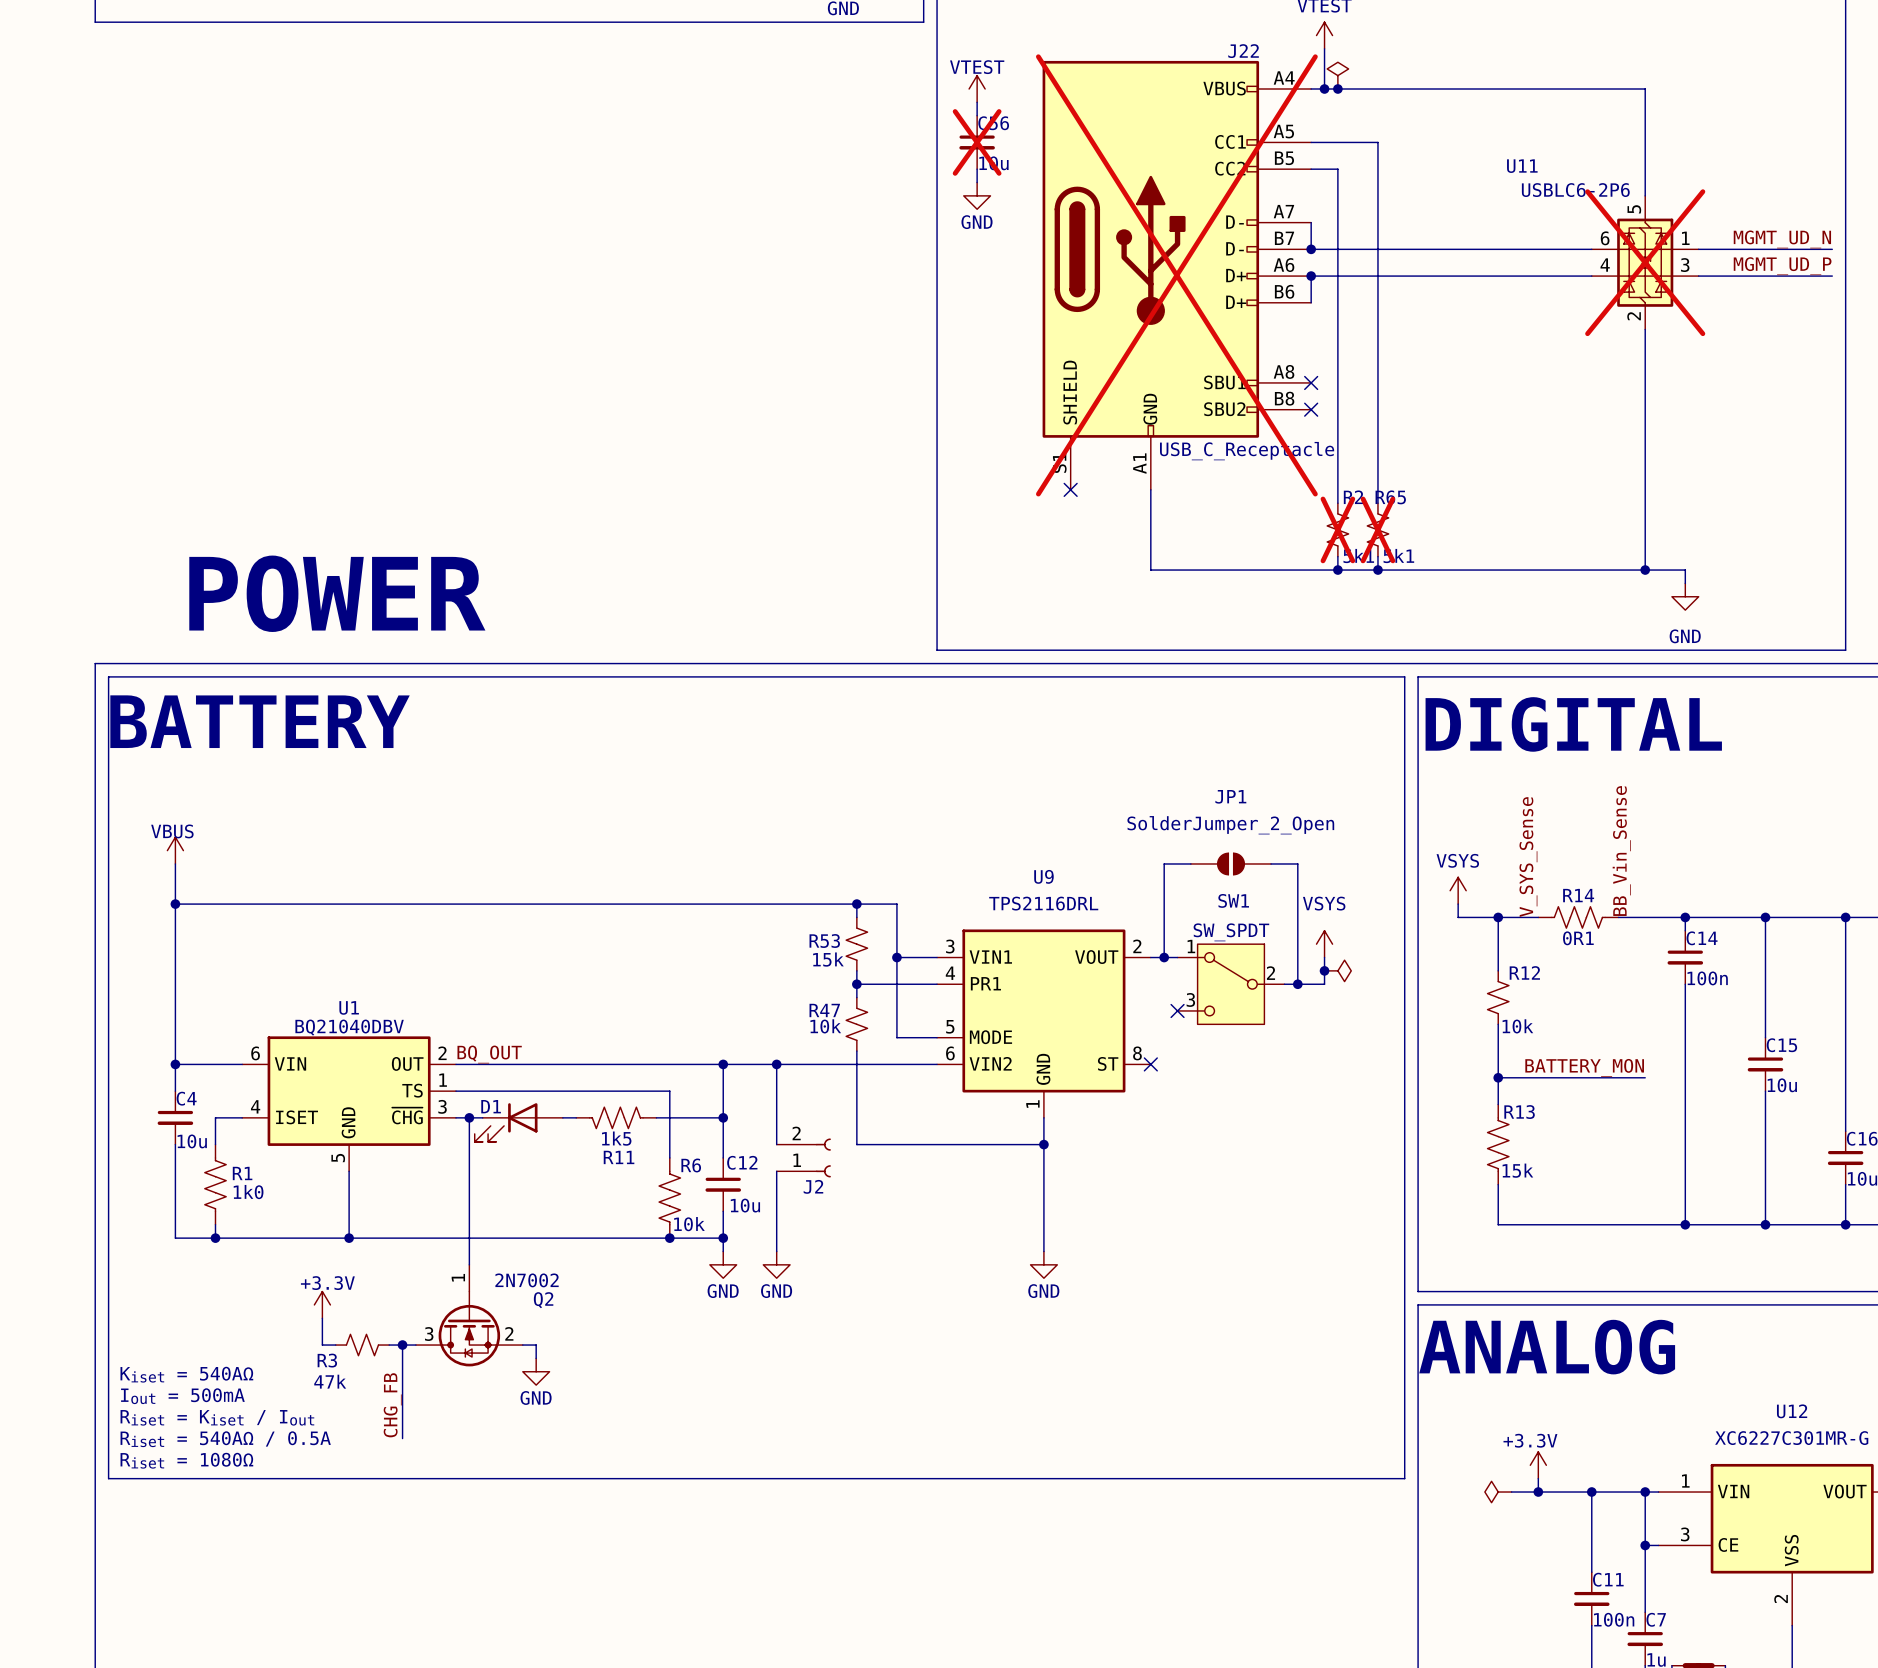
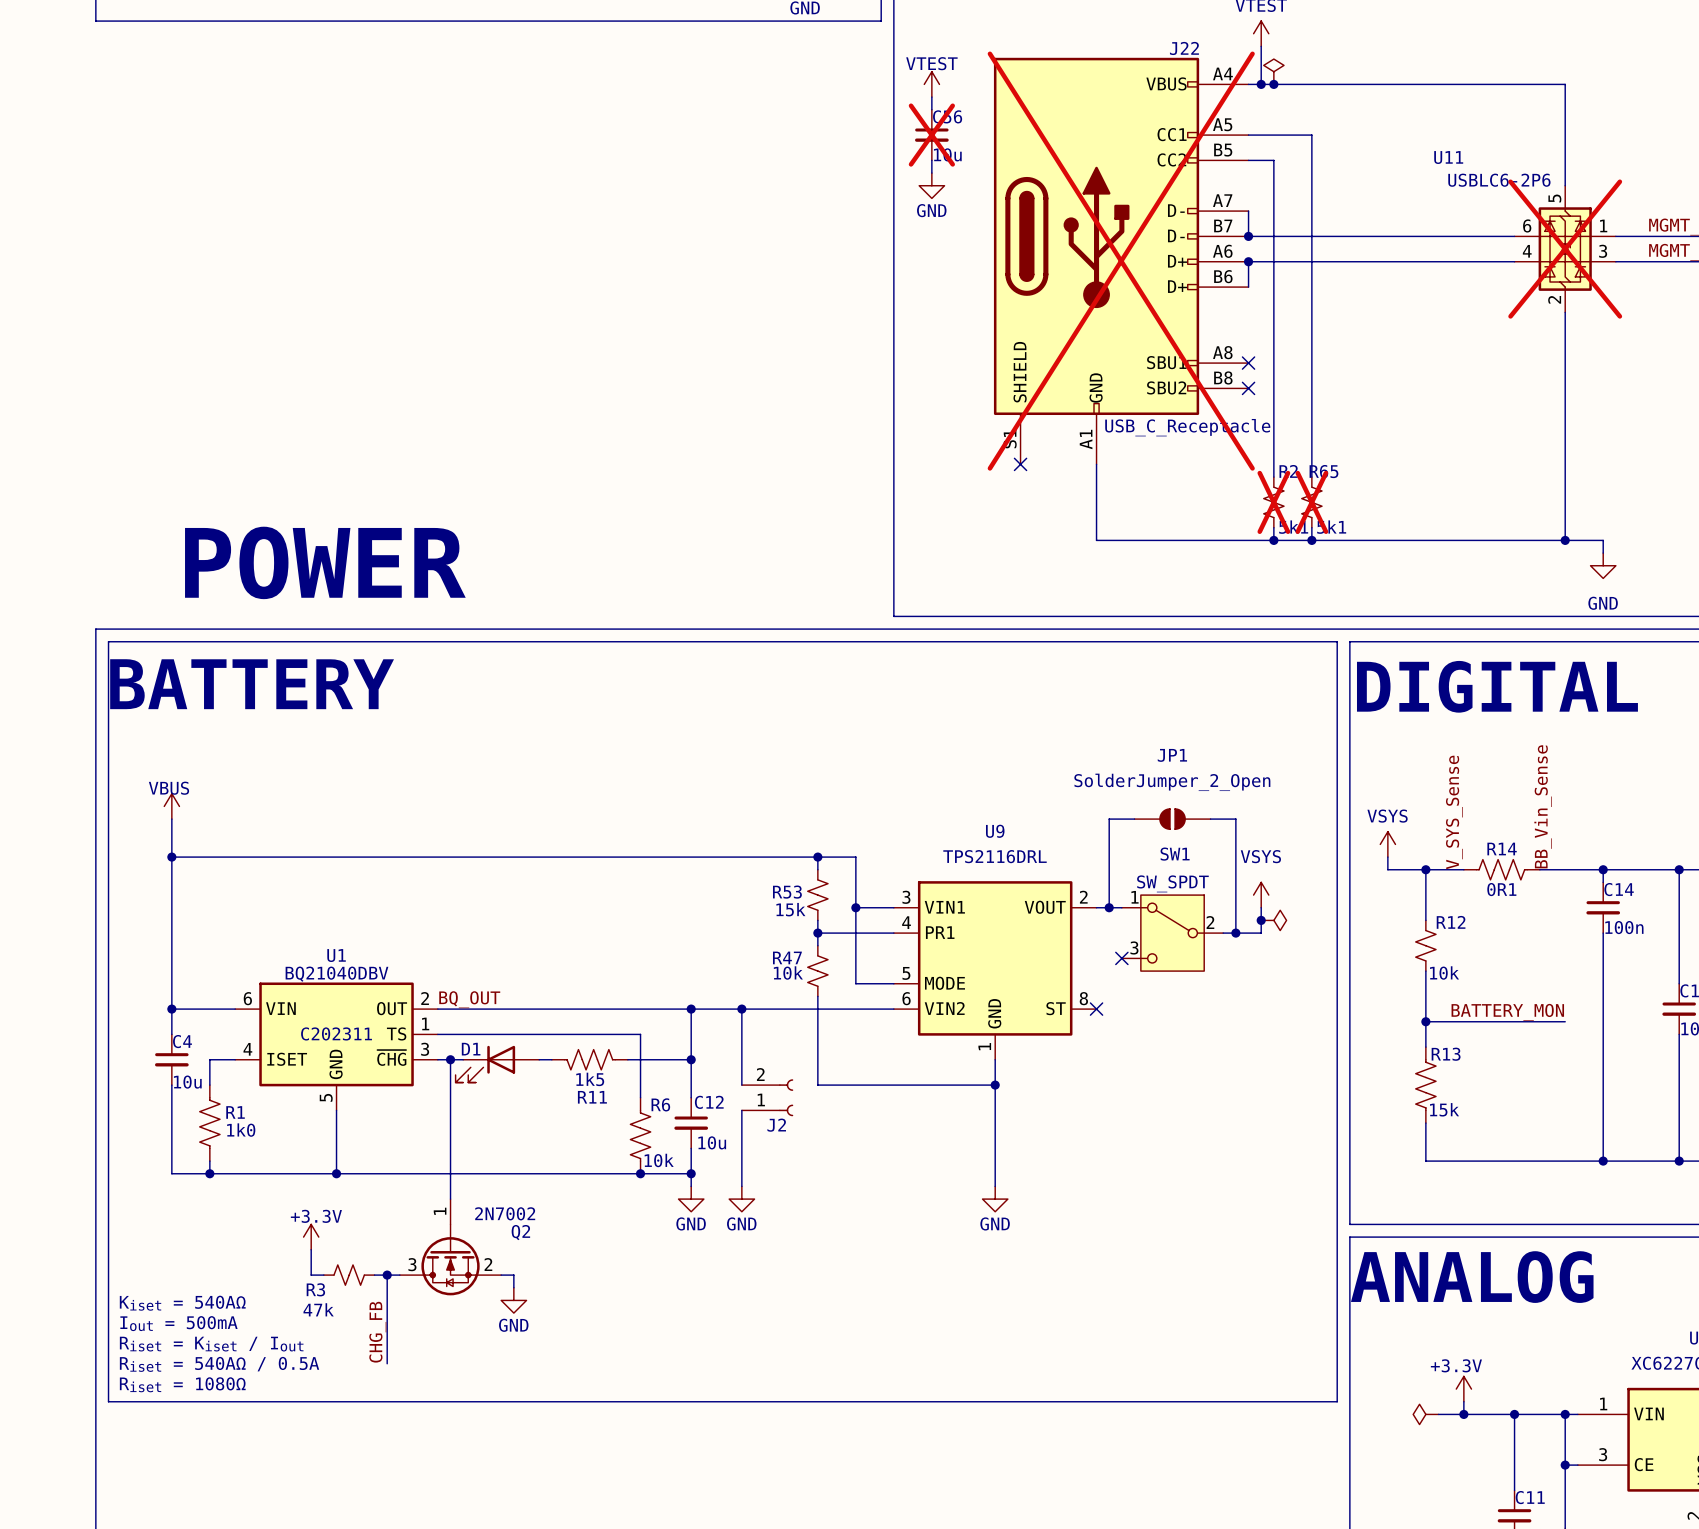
U1 text: none -> C202311 (336, 1033)

